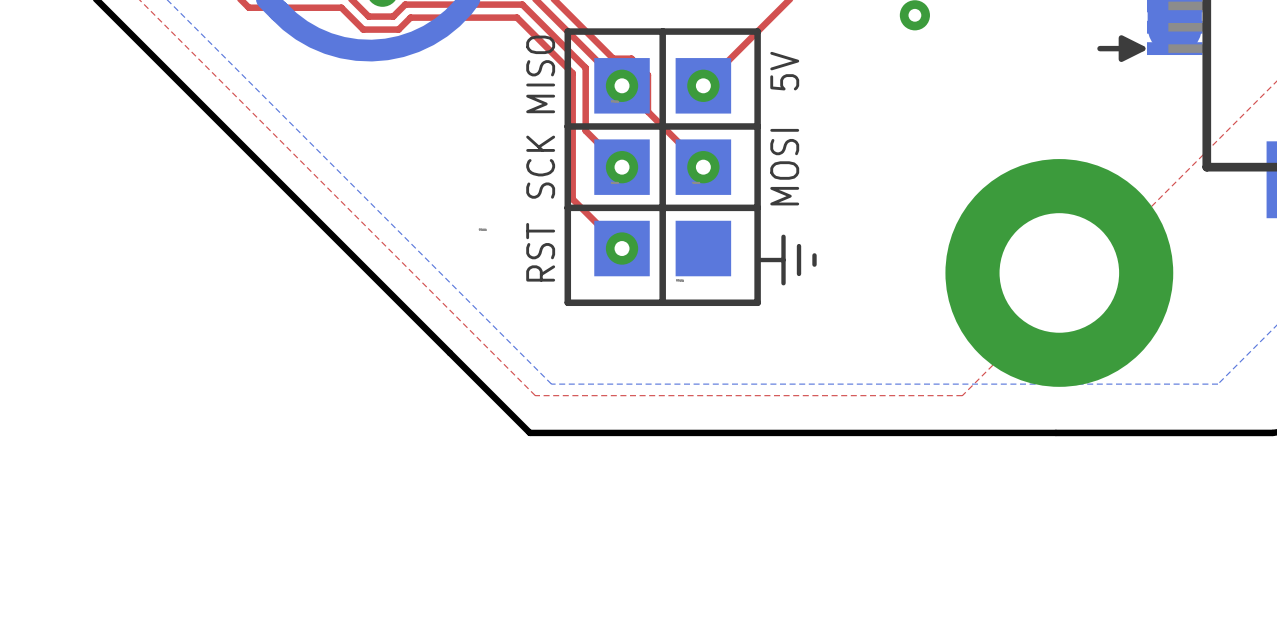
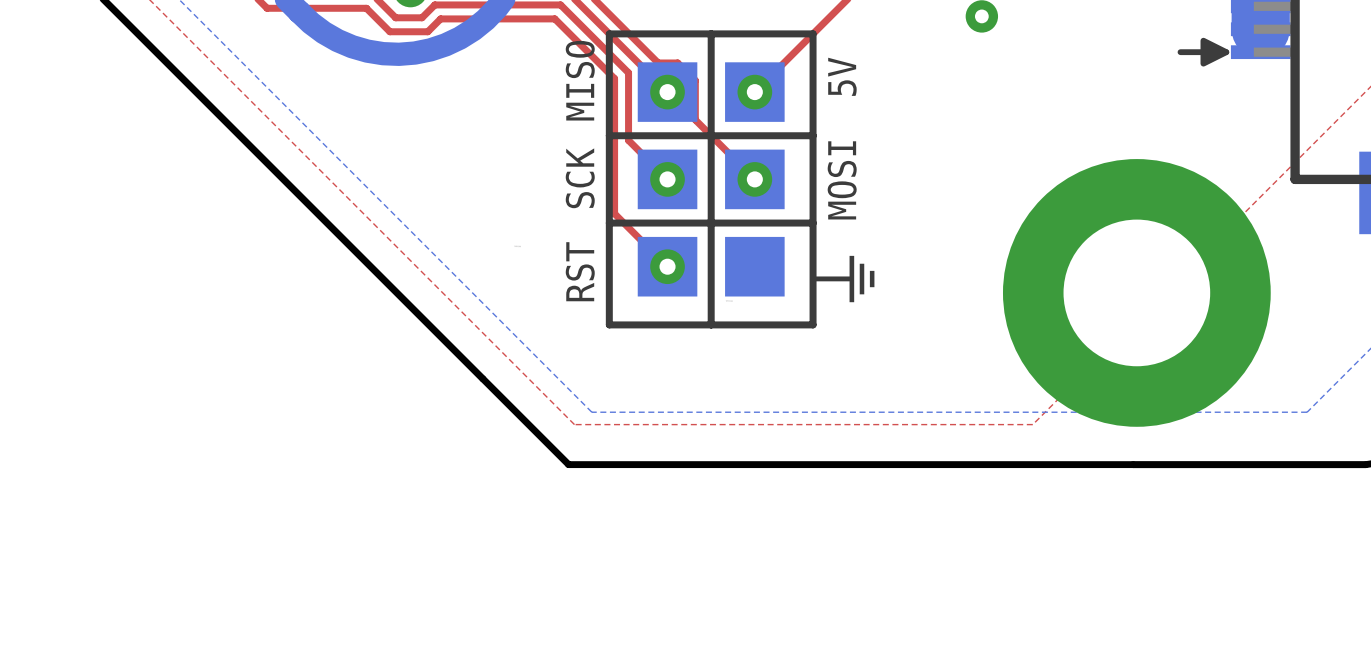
part footprint: [945, 159, 1174, 387] -> [1002, 159, 1271, 427]

